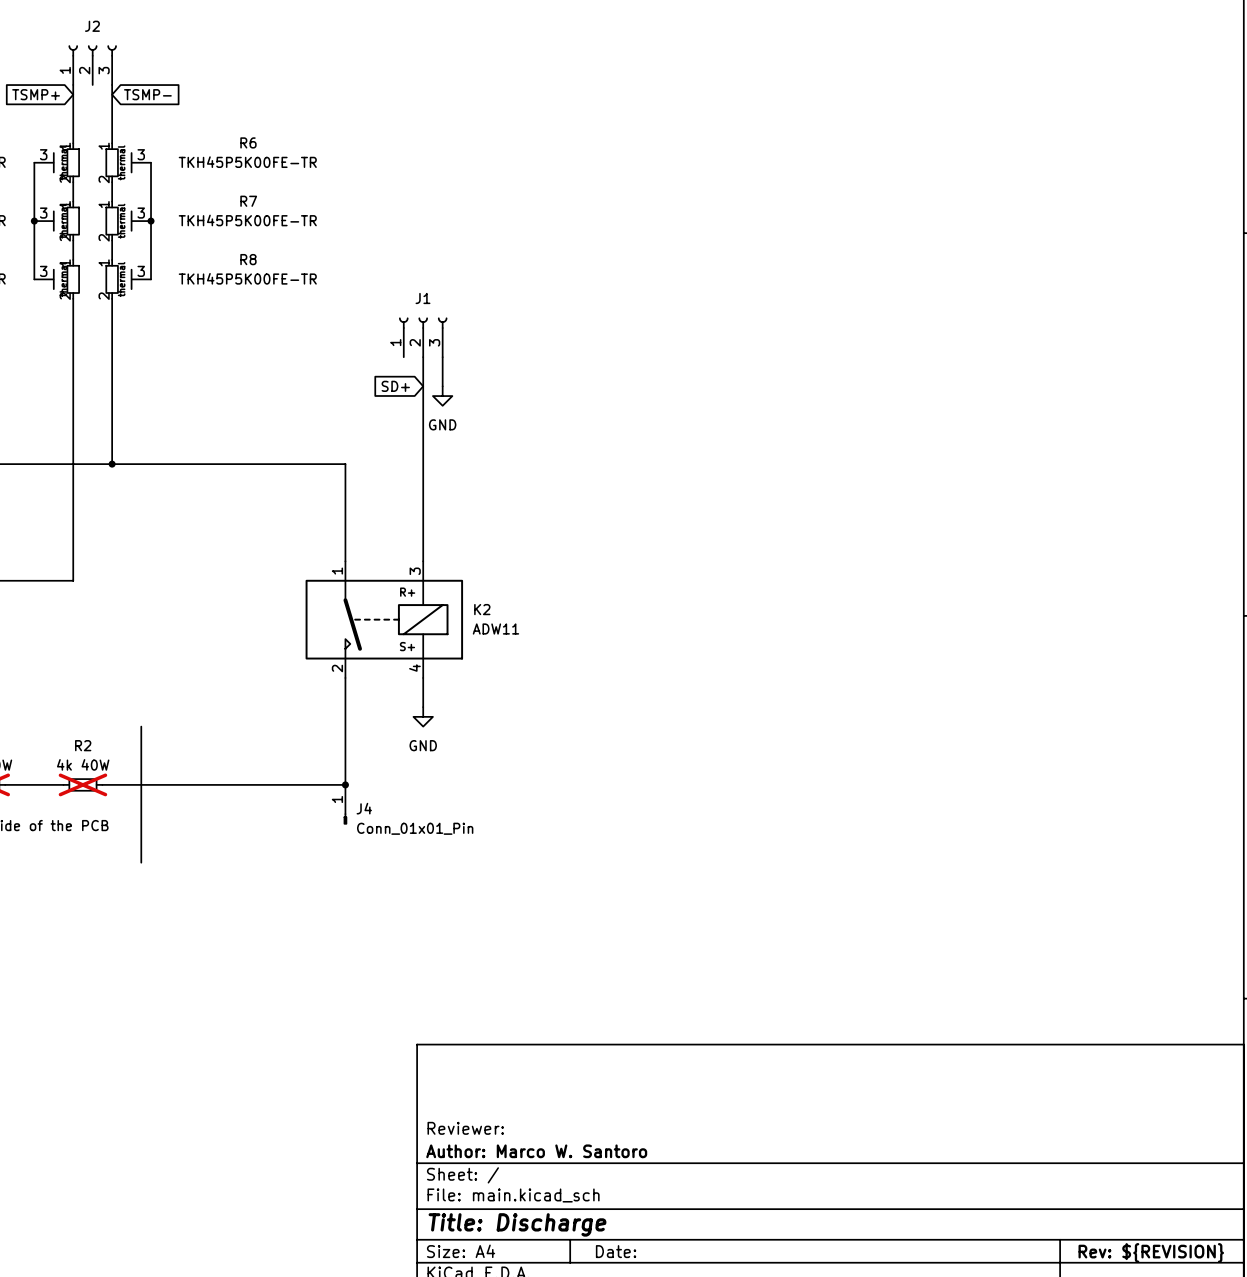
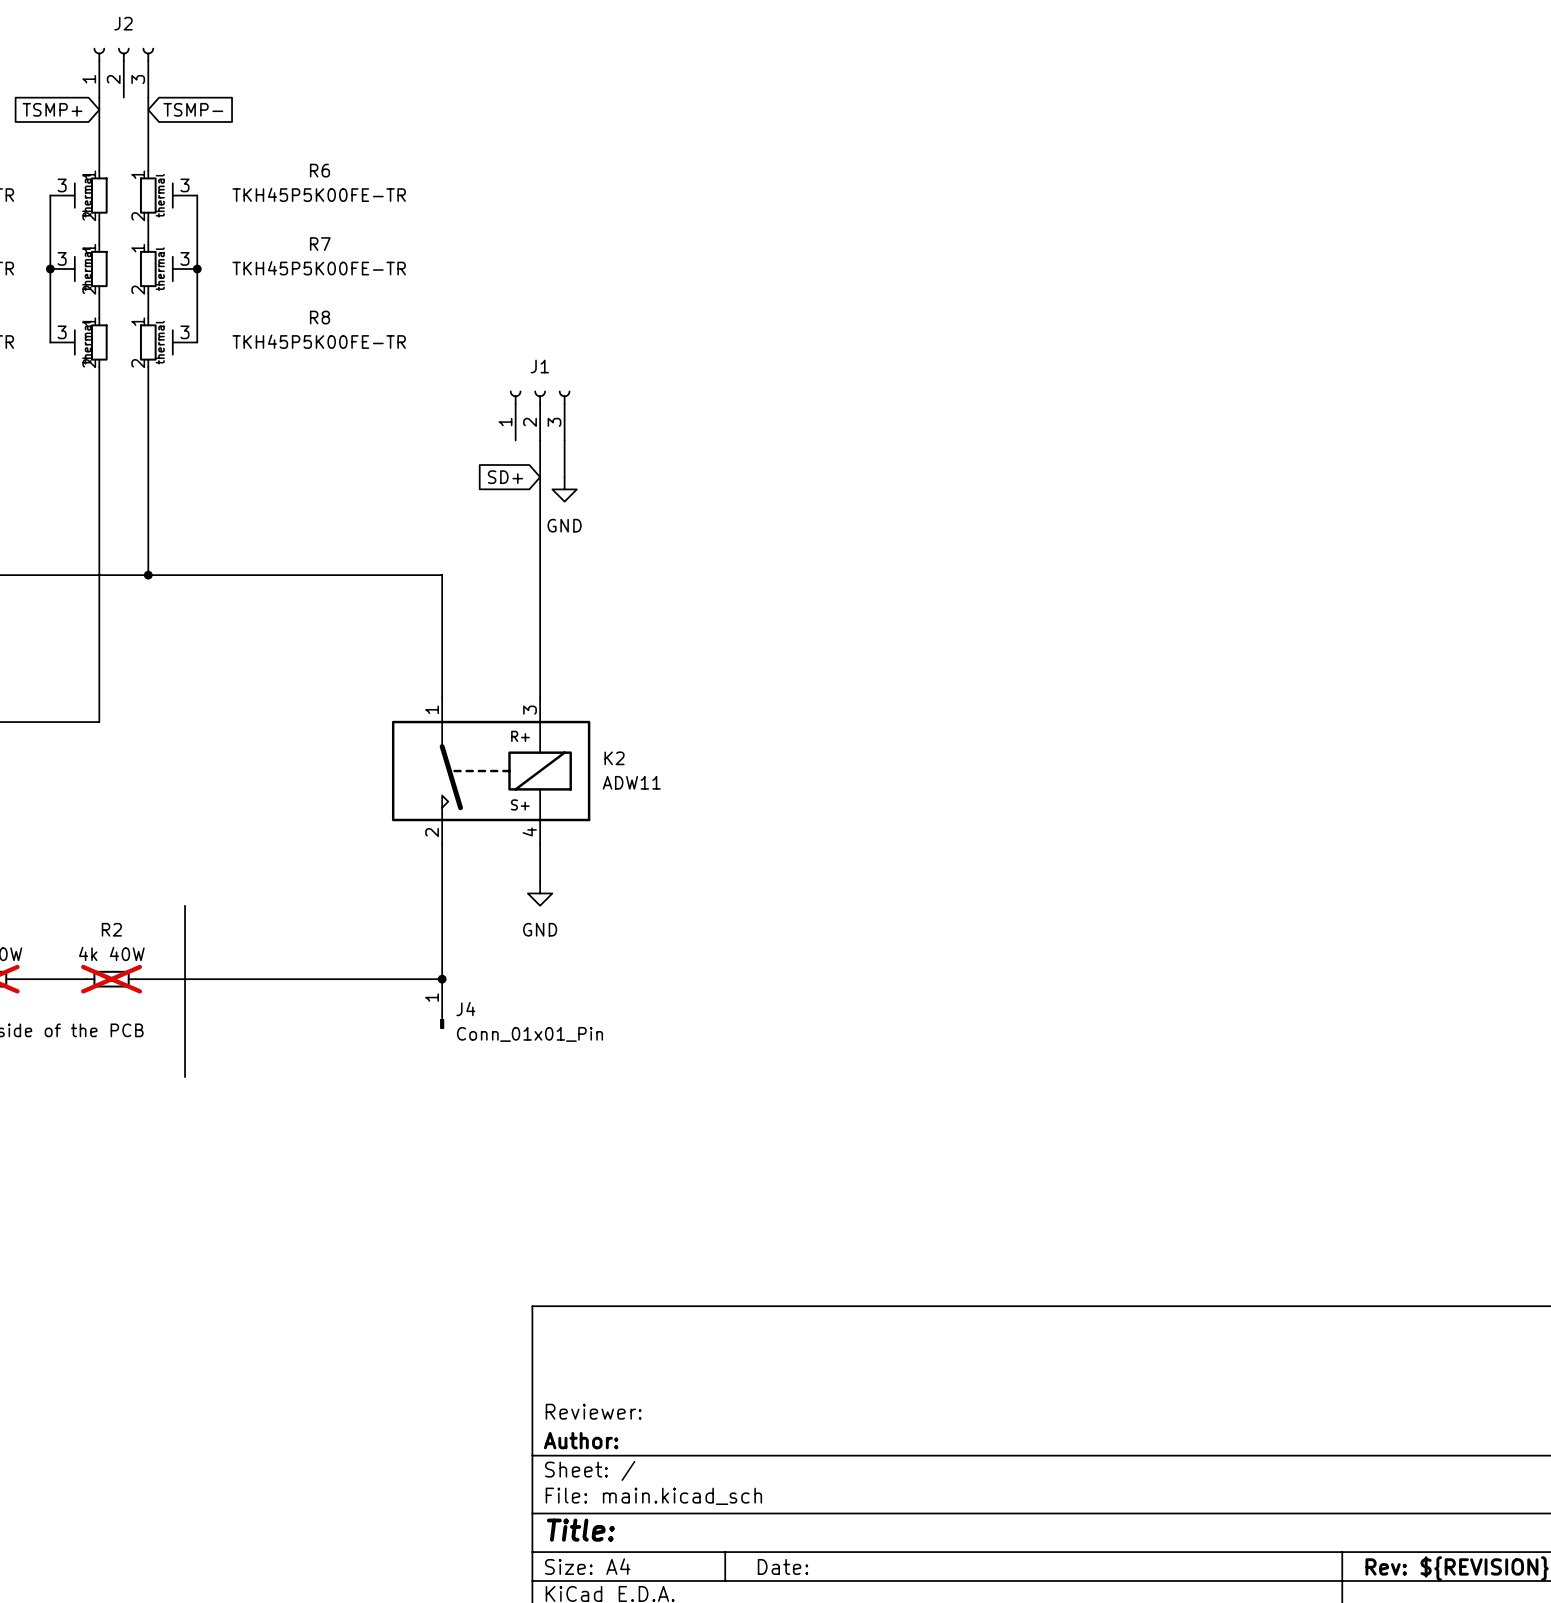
title block: Author: Marco W. Santoro (536, 1151) -> Author: (581, 1440)
title block: Title: Discharge (517, 1224) -> Title: (580, 1530)

